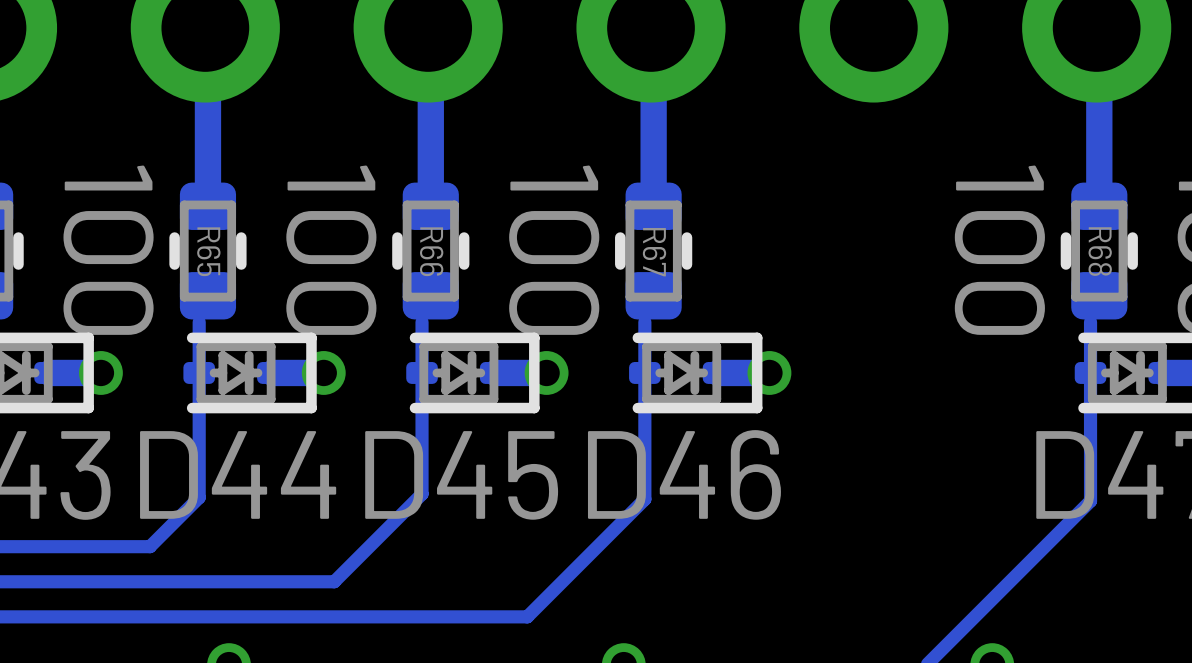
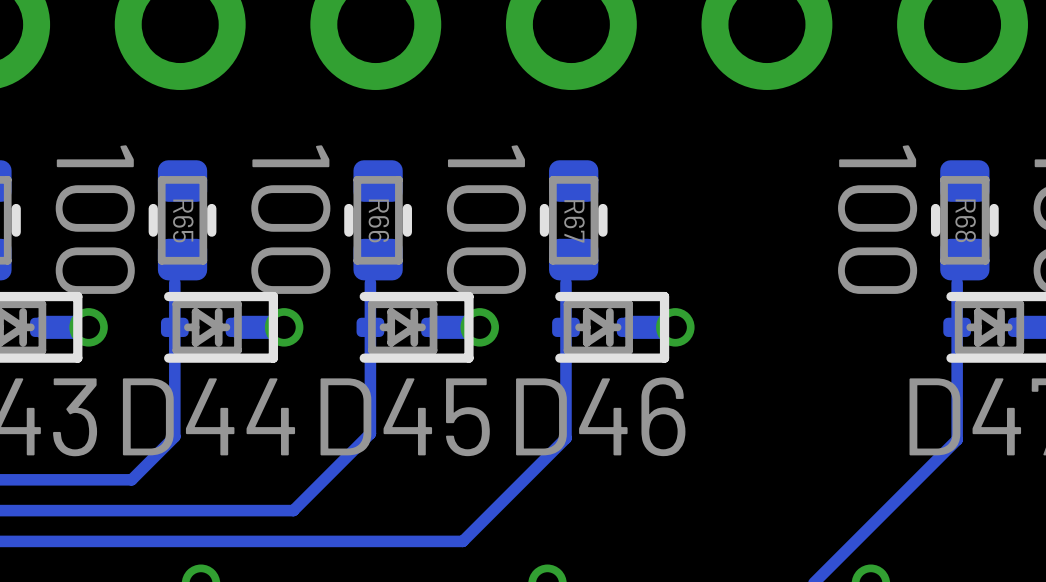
track: (205, 27) (207, 30) (207, 206) -> none
track: (428, 27) (430, 30) (430, 206) -> none
track: (651, 27) (653, 30) (653, 206) -> none
track: (1096, 27) (1099, 30) (1099, 206) -> none

